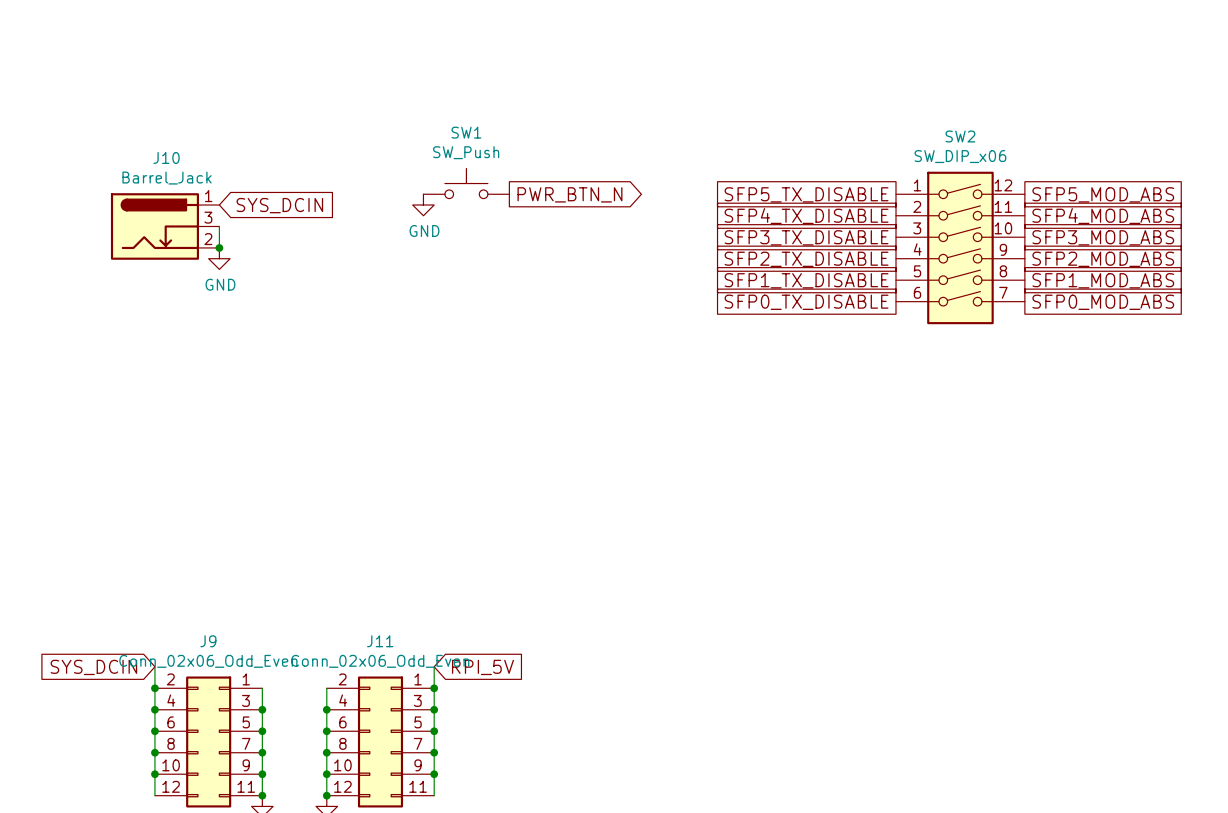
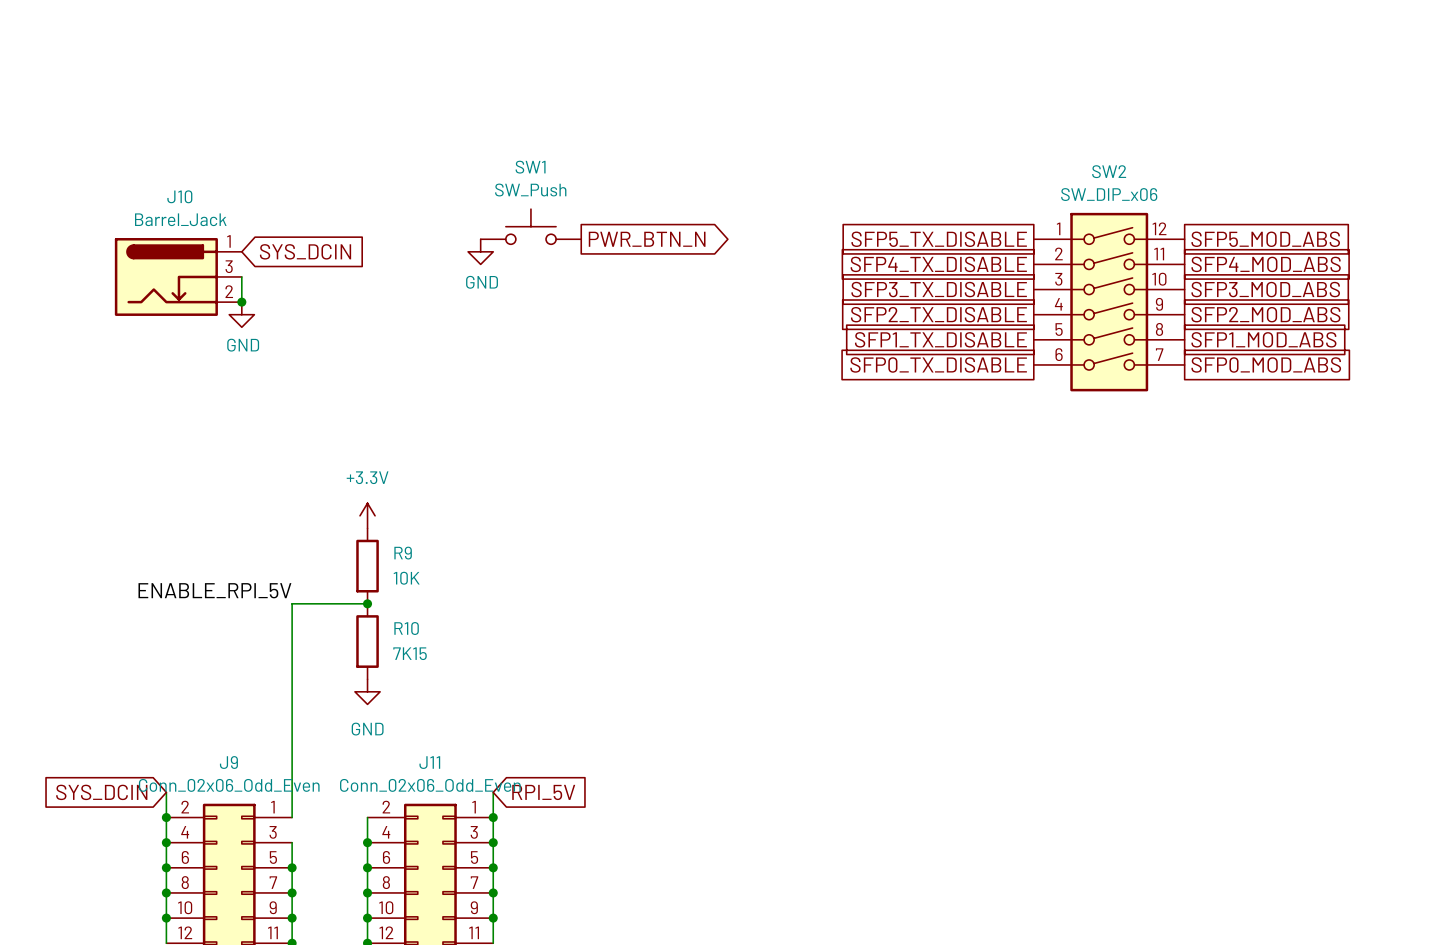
power symbol: none -> +3.3V (367, 515)
R9: none -> 10K (367, 566)
label: none -> ENABLE_RPI_5V (214, 590)
junction: none -> (367, 603)
R10: none -> 7K15 (367, 641)
power symbol: none -> GND (367, 691)
wire: (262, 688) (262, 709) -> (292, 817) (292, 603) (367, 603)
junction: (262, 709) -> none

